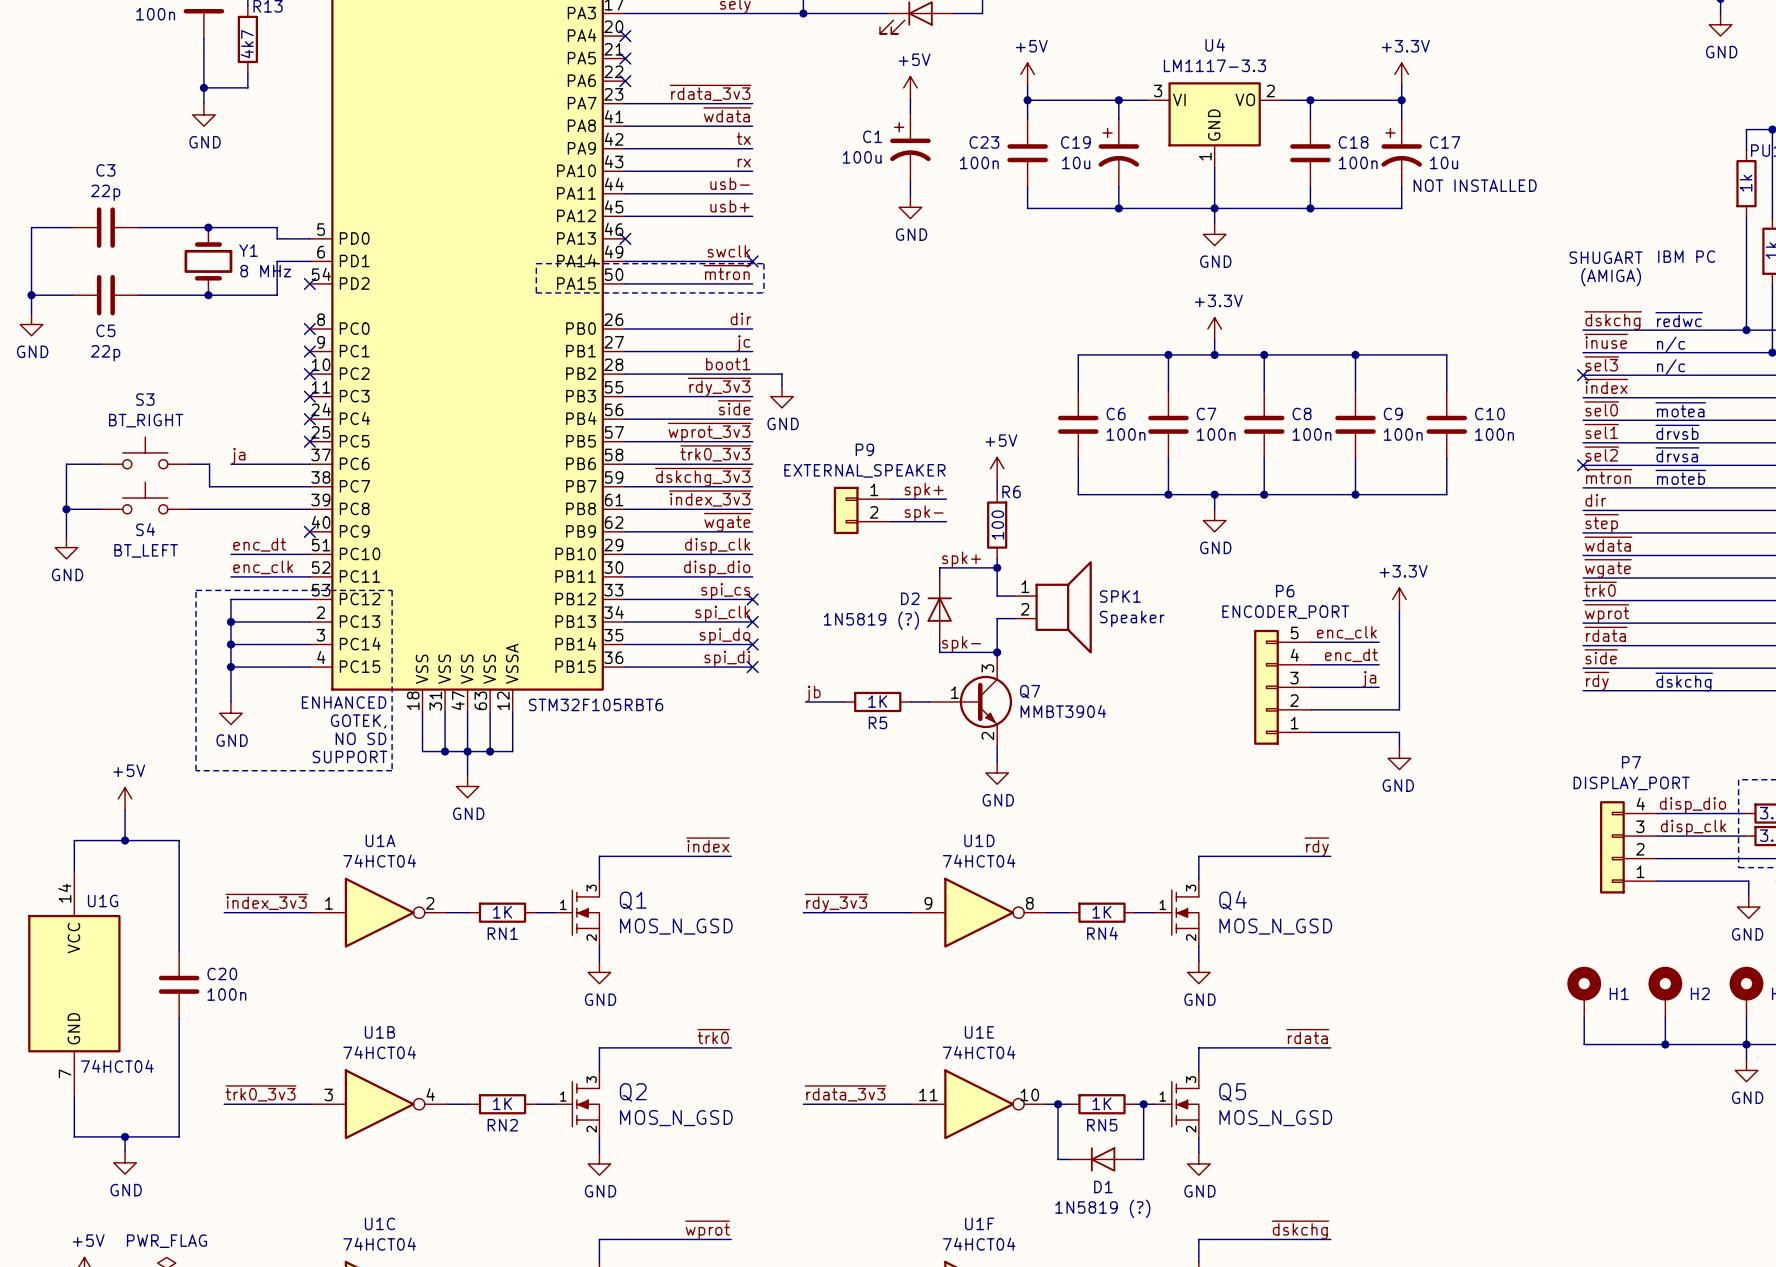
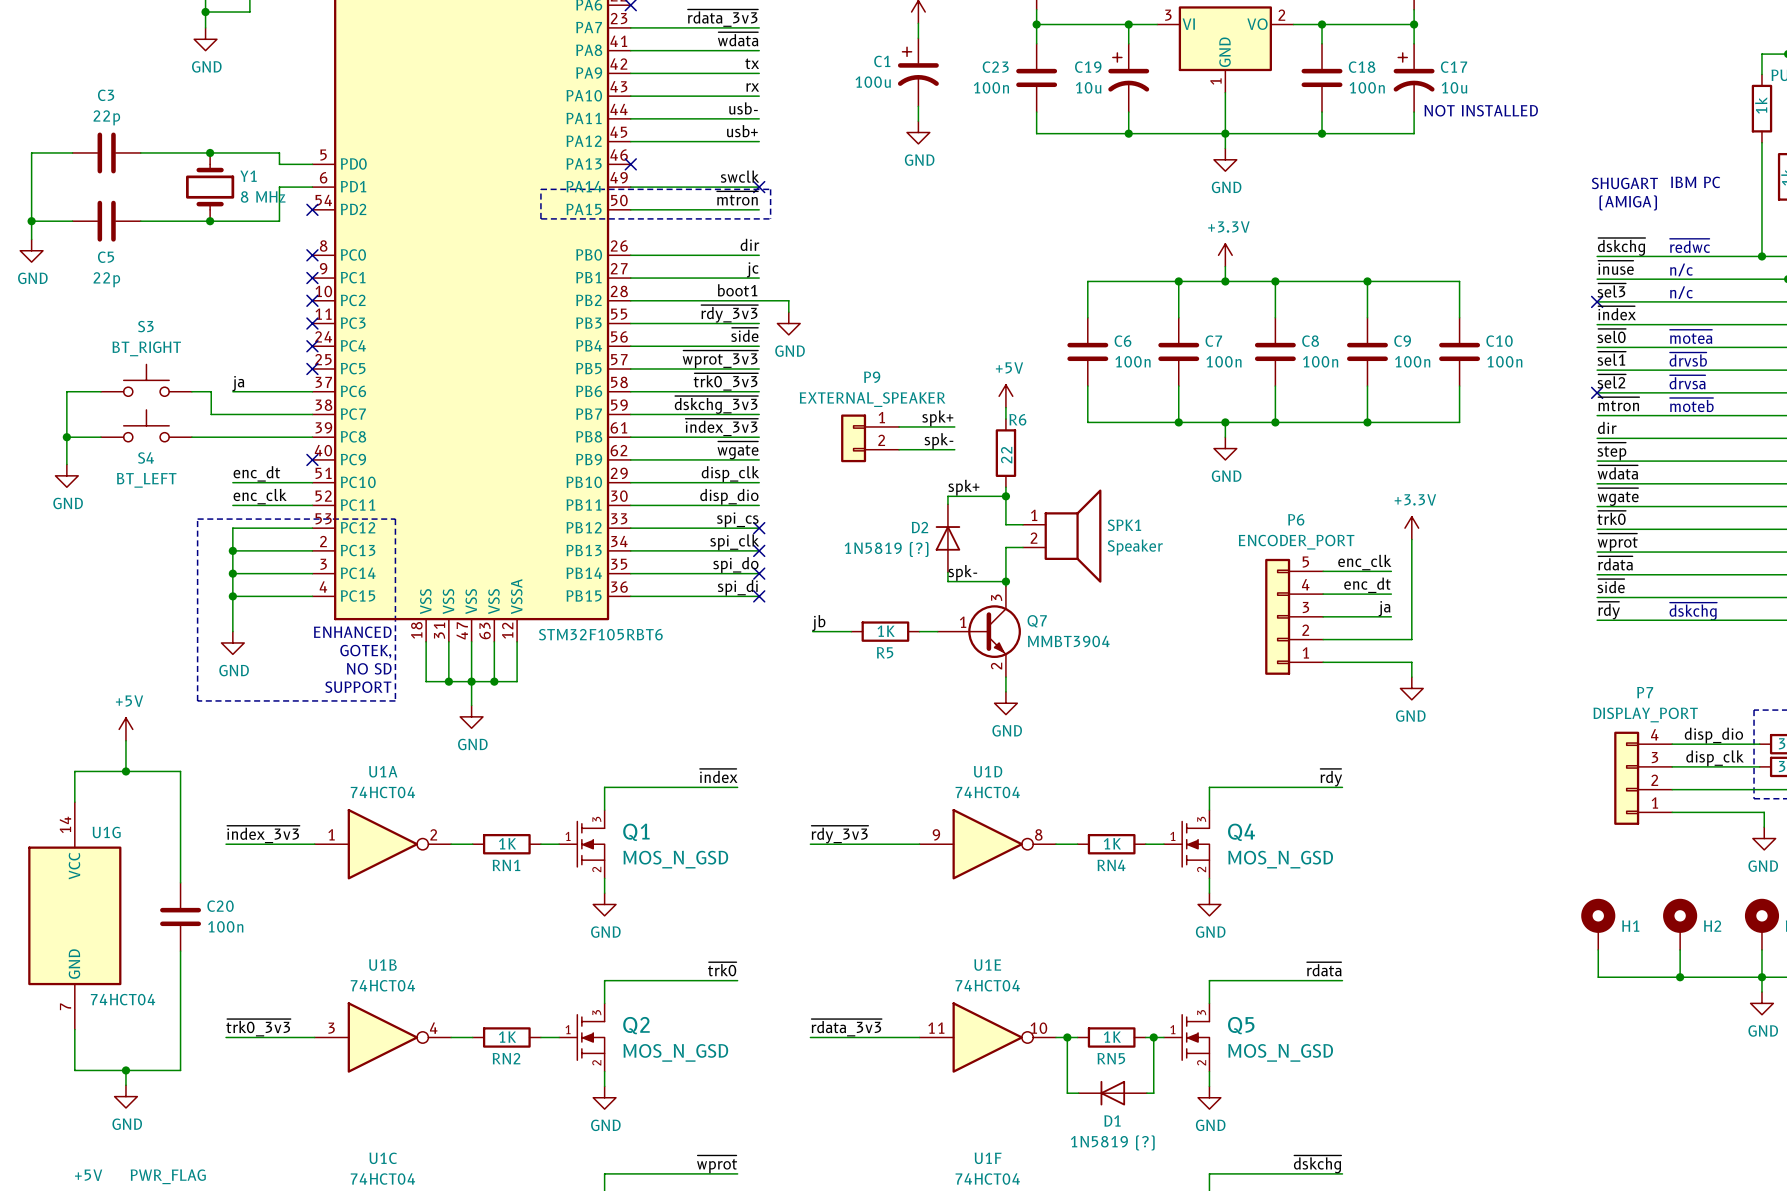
R6 value: 100 (997, 524) -> 22 (1006, 455)

